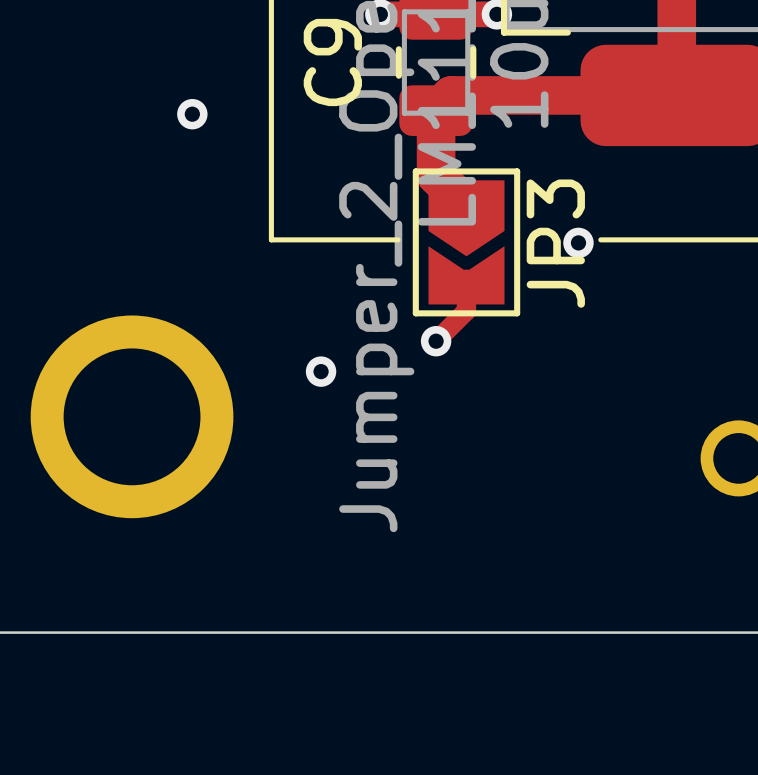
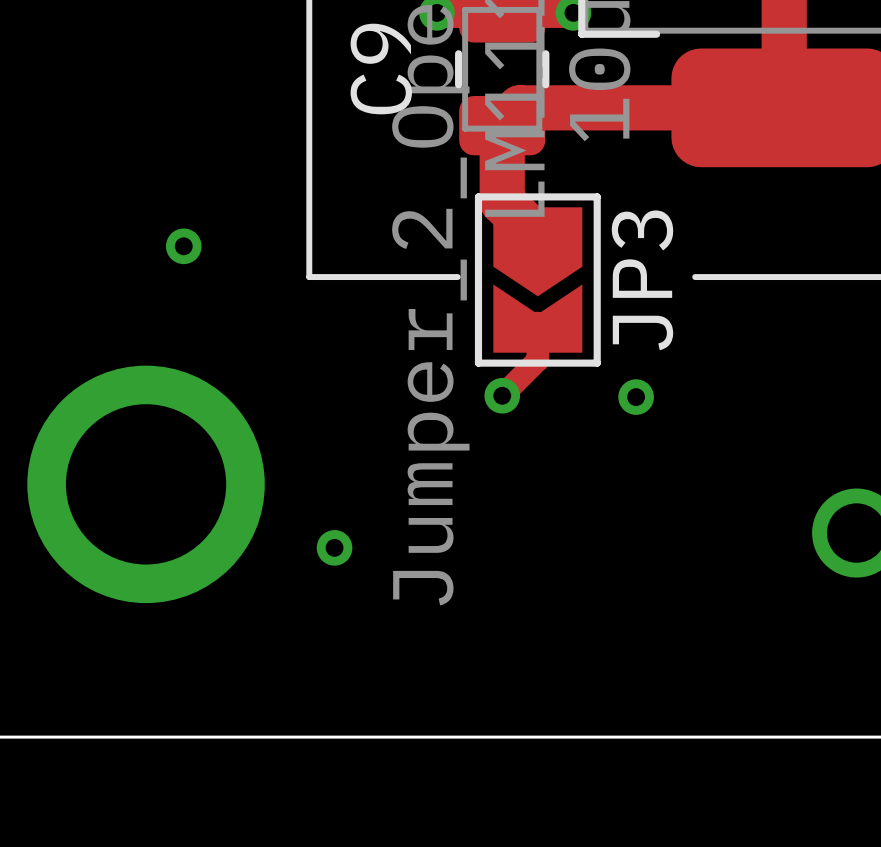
via position: (192, 114) -> (183, 246)
via position: (578, 242) -> (636, 397)
via position: (321, 371) -> (334, 547)

